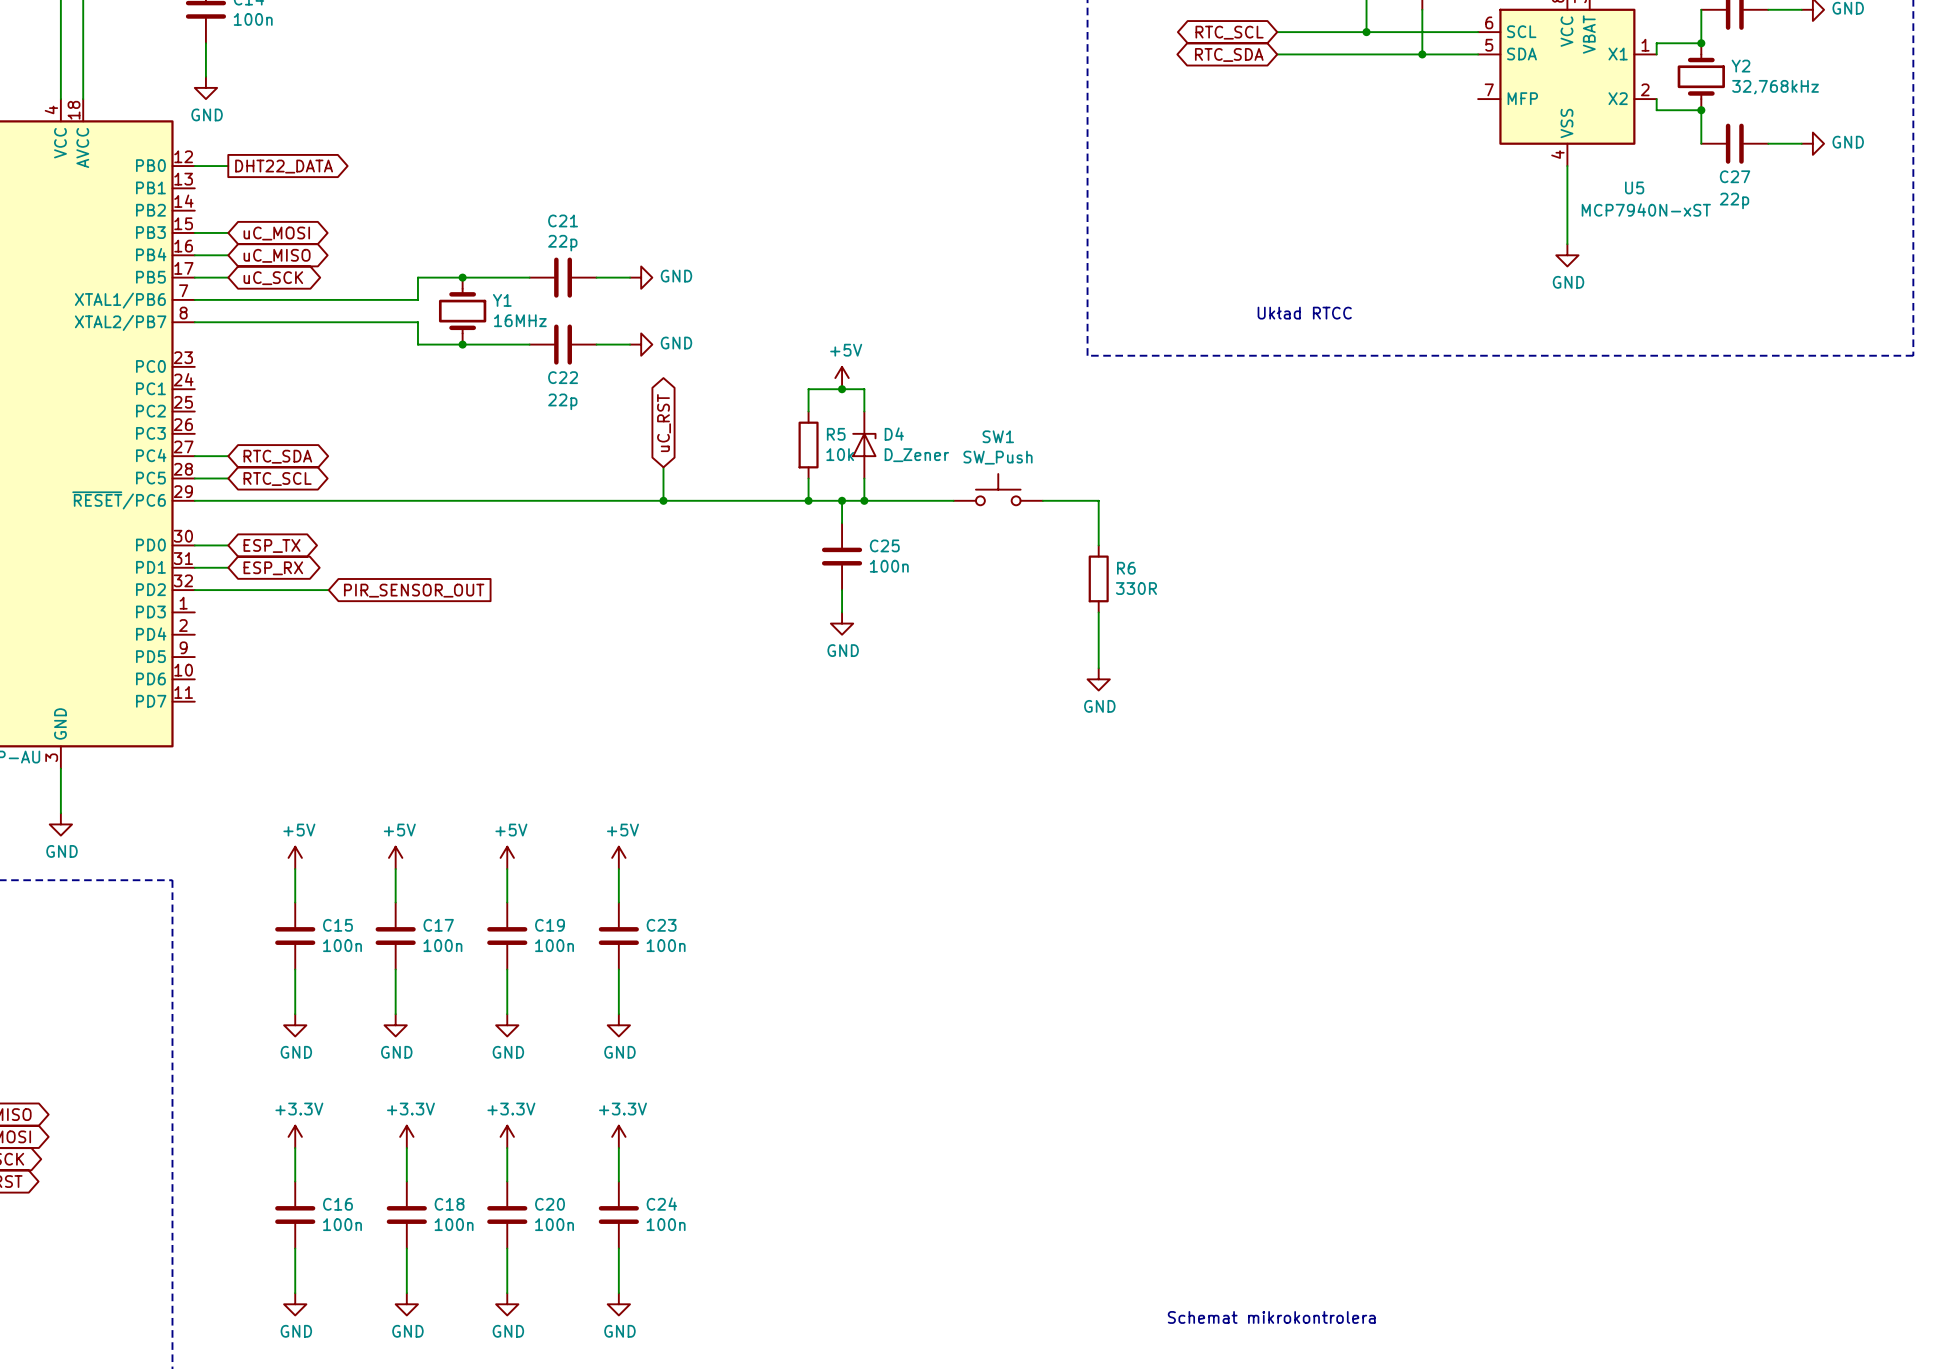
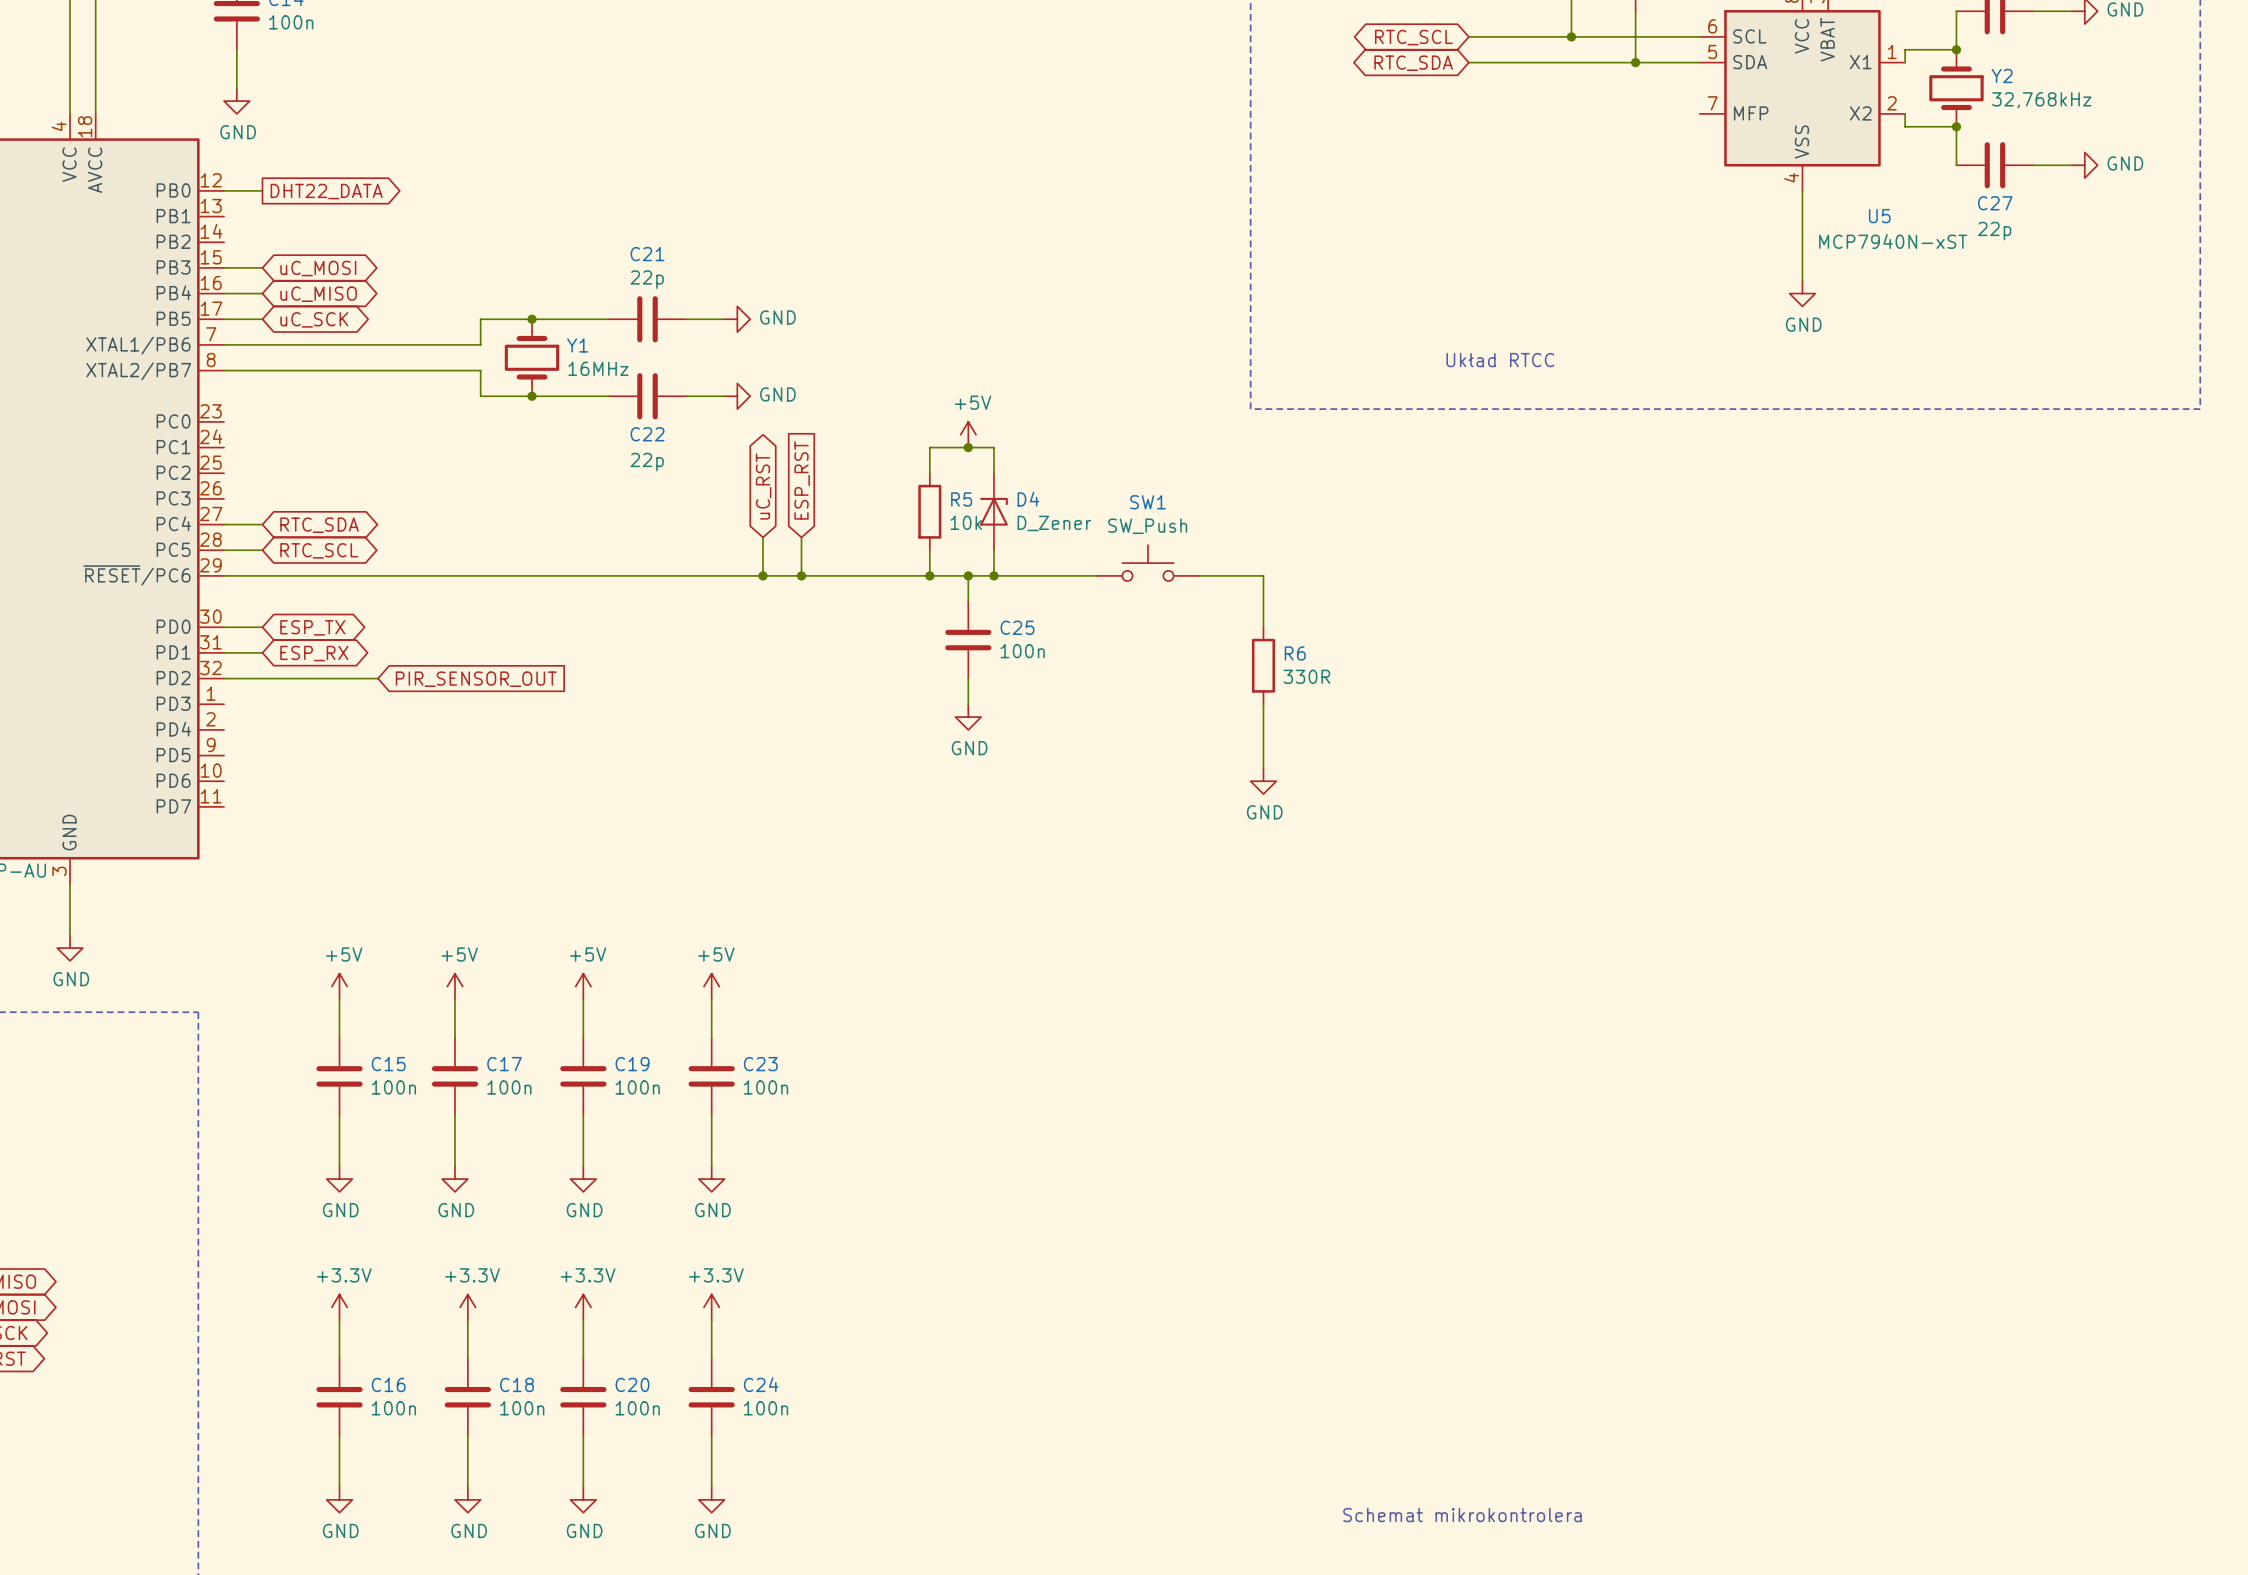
global label: none -> ESP_RST (802, 480)
wire: none -> (801, 537) (801, 575)
junction: none -> (801, 575)

